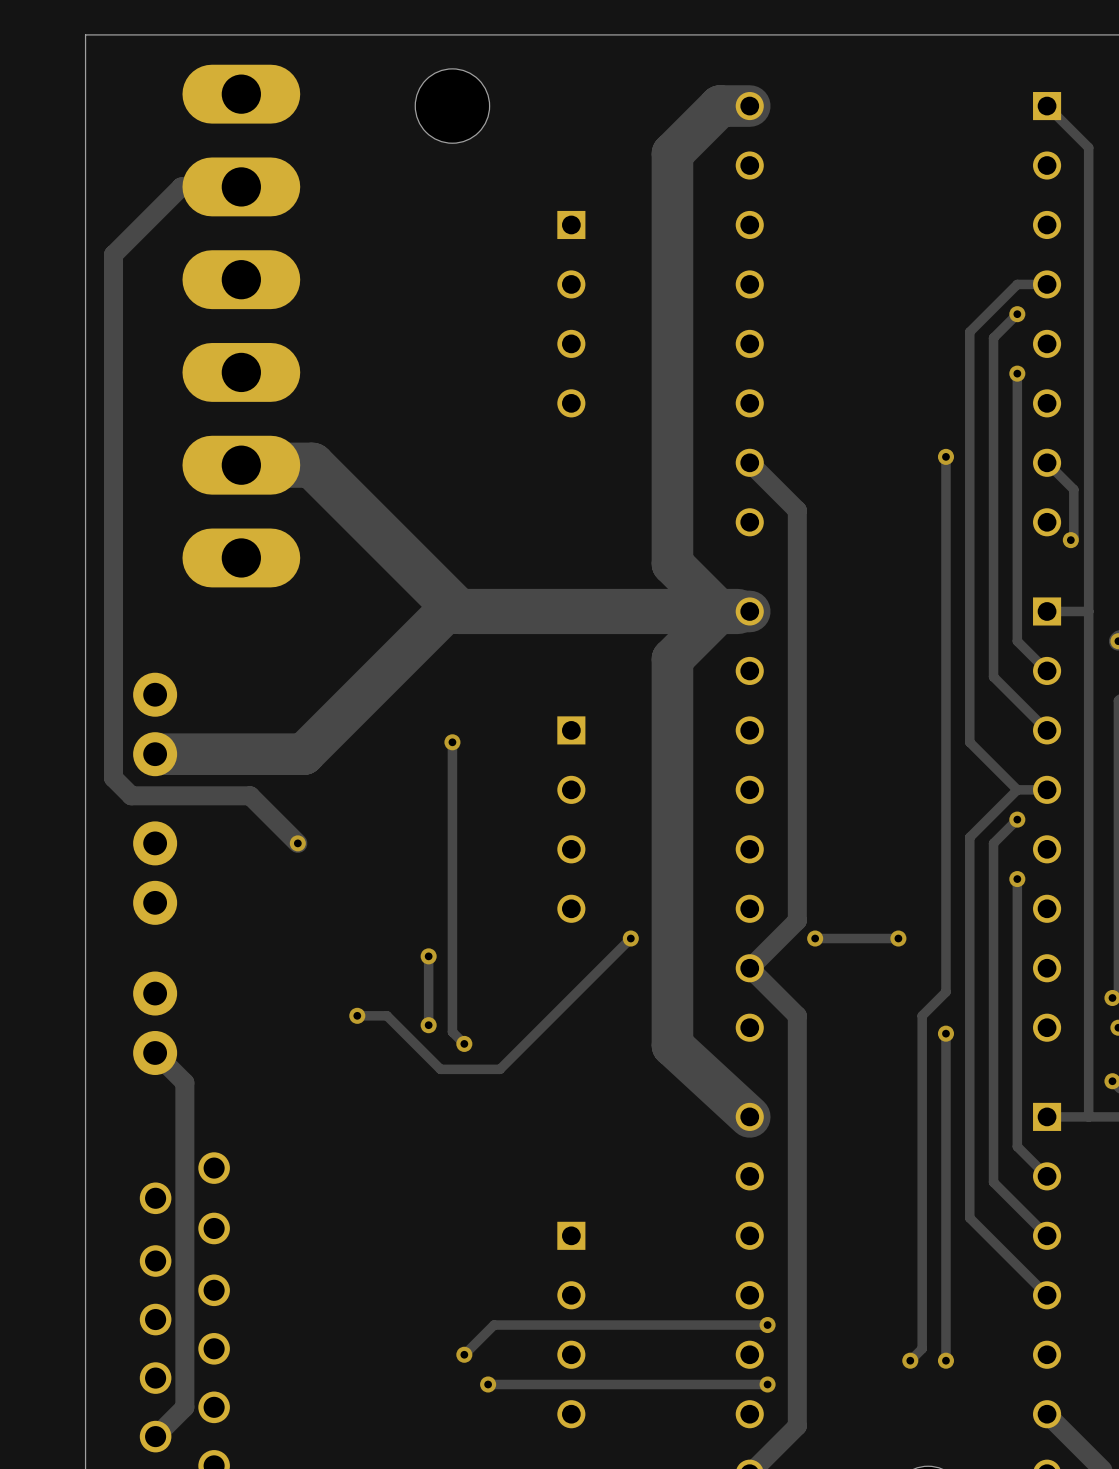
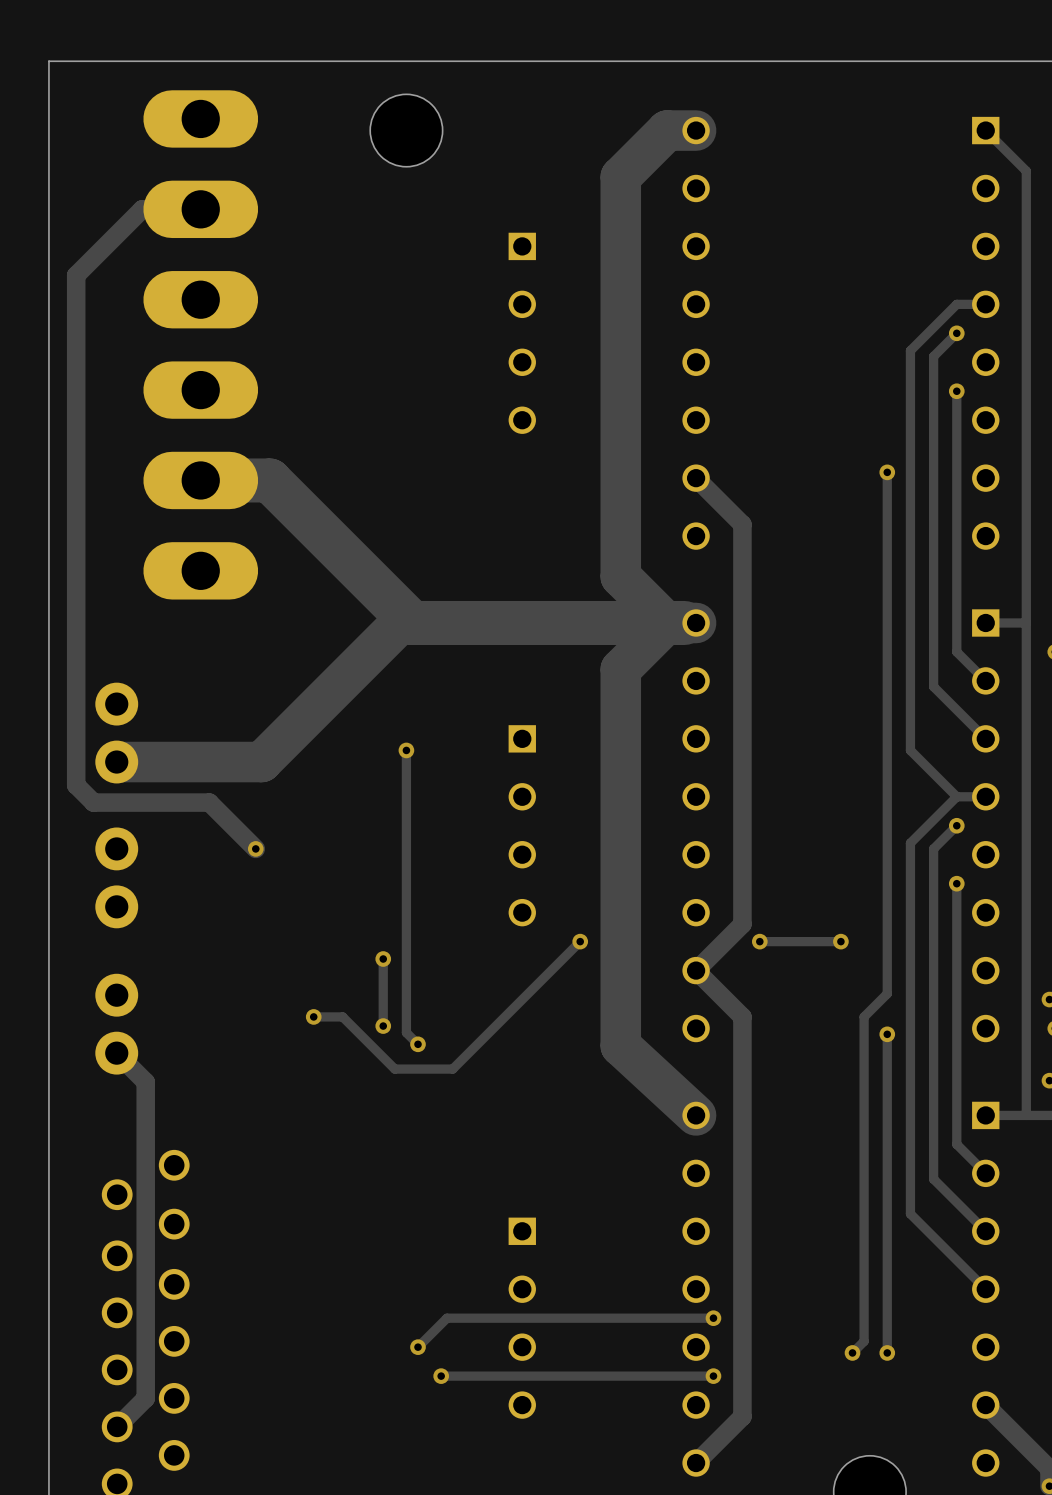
track: (1047, 462) (1073, 489) (1073, 537) (1070, 540) -> none
via: (1070, 540) -> none

